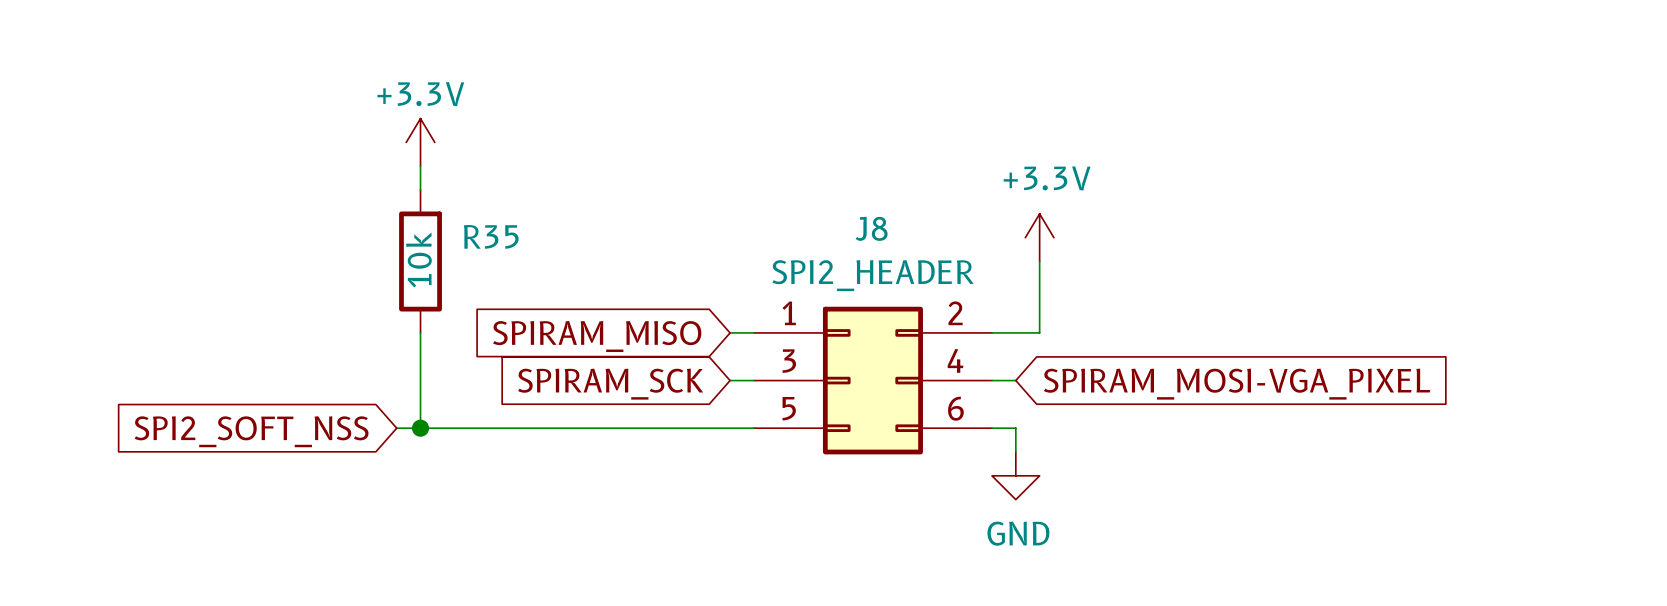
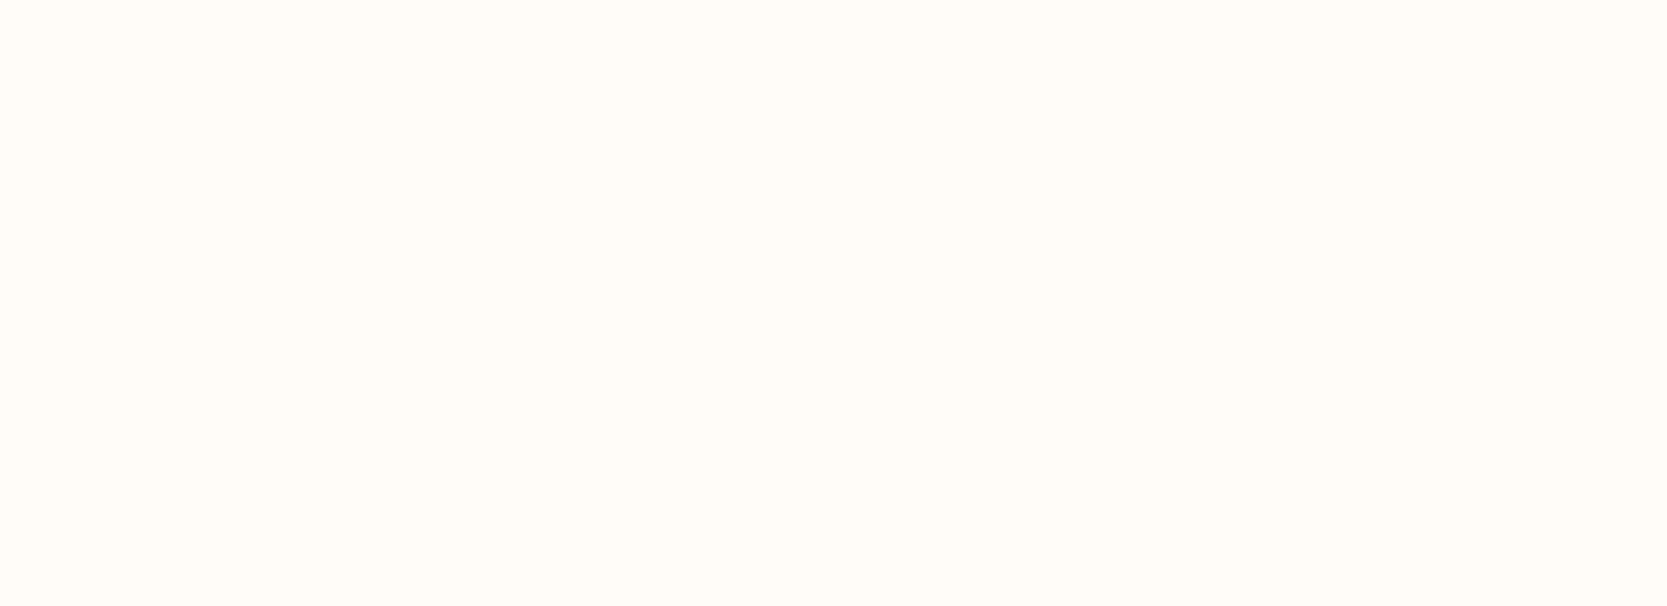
power symbol: +3.3V (420, 142) -> none
wire: (420, 166) (420, 190) -> none
power symbol: +3.3V (1039, 237) -> none
R35: 10k (420, 261) -> none
wire: (1039, 261) (1039, 332) (992, 332) -> none
wire: (420, 332) (420, 428) -> none
wire: (730, 332) (753, 332) -> none
global label: SPIRAM_MISO (597, 336) -> none
wire: (730, 380) (753, 380) -> none
J8: SPI2_HEADER (872, 380) -> none
wire: (992, 380) (1015, 380) -> none
global label: SPIRAM_SCK (610, 384) -> none
global label: SPIRAM_MOSI-VGA_PIXEL (1237, 384) -> none
wire: (396, 428) (753, 428) -> none
junction: (420, 428) -> none
wire: (992, 428) (1015, 428) (1015, 452) -> none
global label: SPI2_SOFT_NSS (251, 431) -> none
power symbol: GND (1015, 475) -> none

